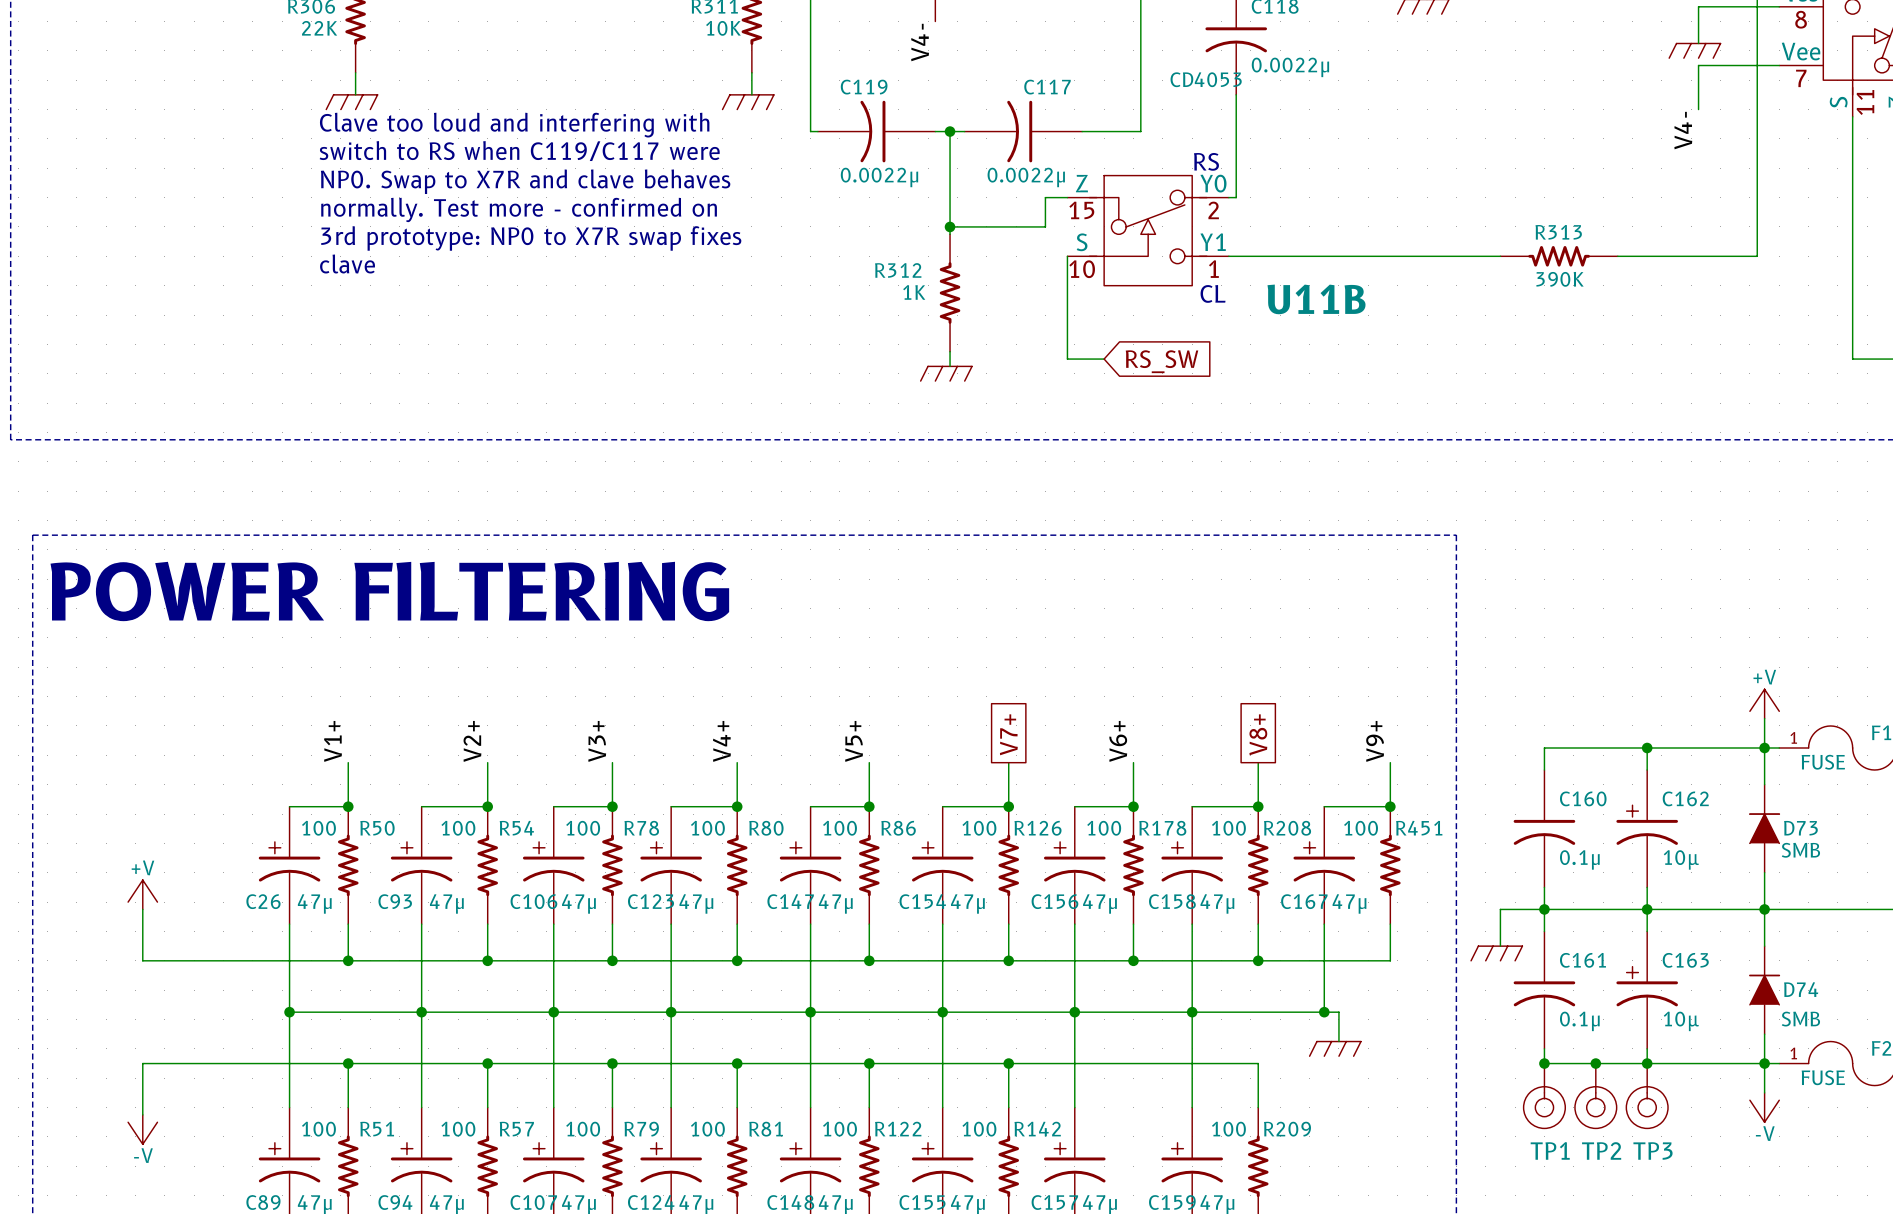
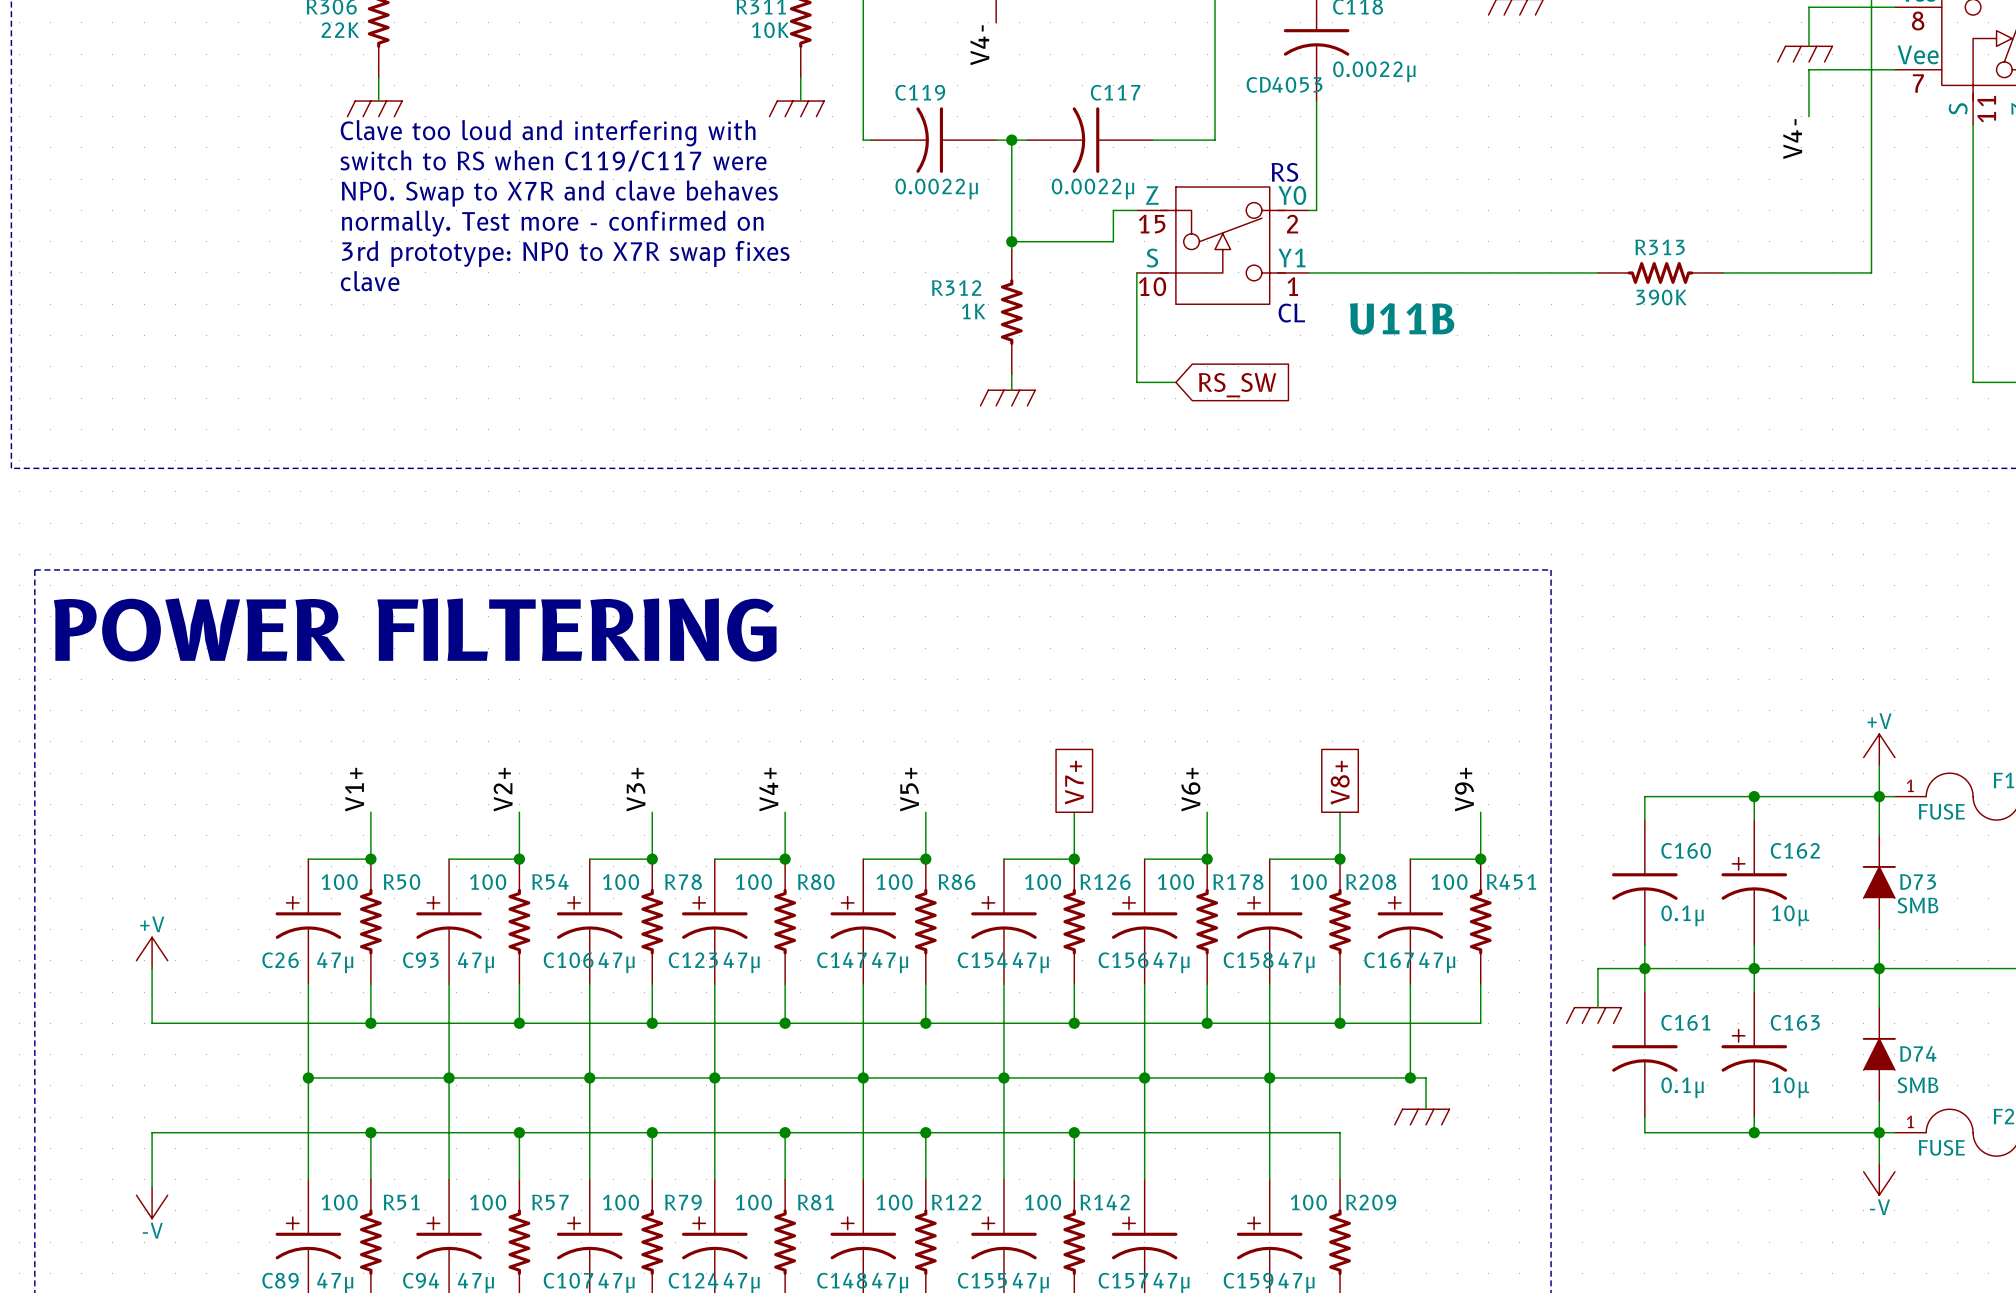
junction: (1544, 1063) -> none
junction: (1595, 1063) -> none
TP1: (1544, 1095) -> none
TP2: (1595, 1095) -> none
TP3: (1647, 1095) -> none

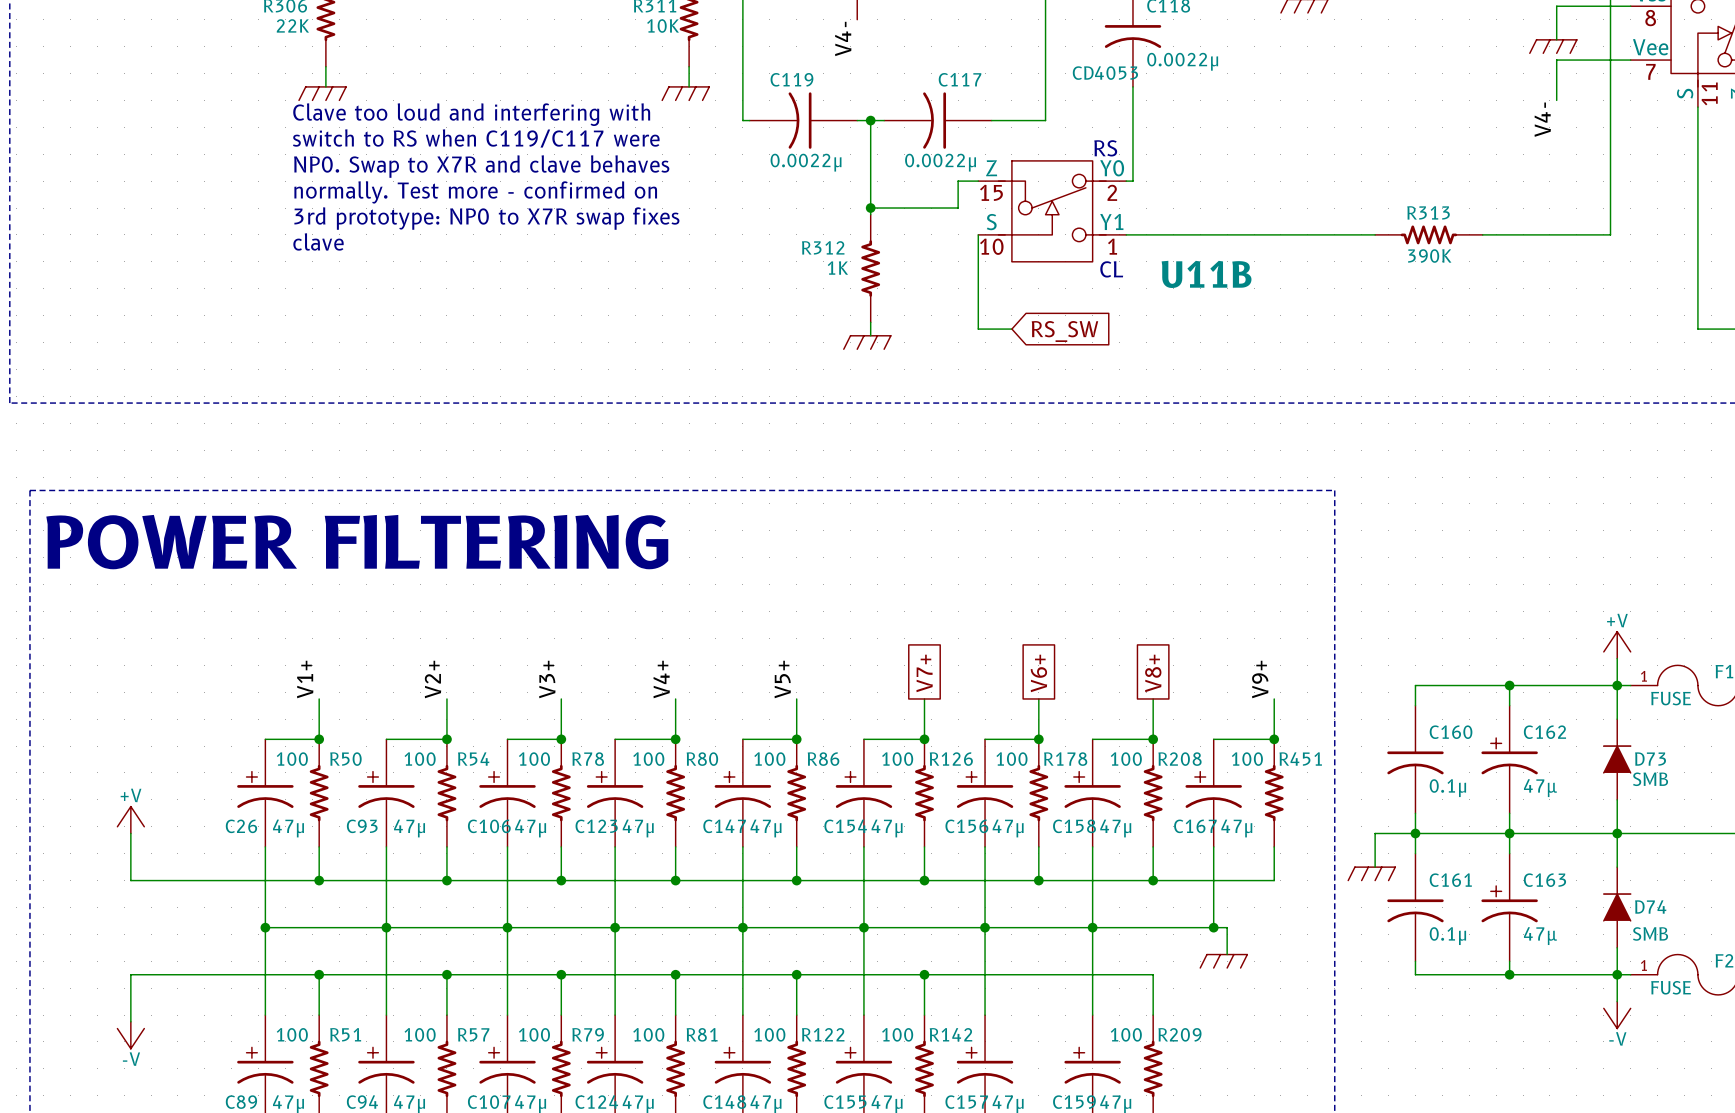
global label: none -> V6+ (1038, 673)
label: V6+ (1190, 789) -> none
C162 value: 10µ (1790, 915) -> 47µ (1540, 788)
C163 value: 10µ (1790, 1087) -> 47µ (1540, 936)

